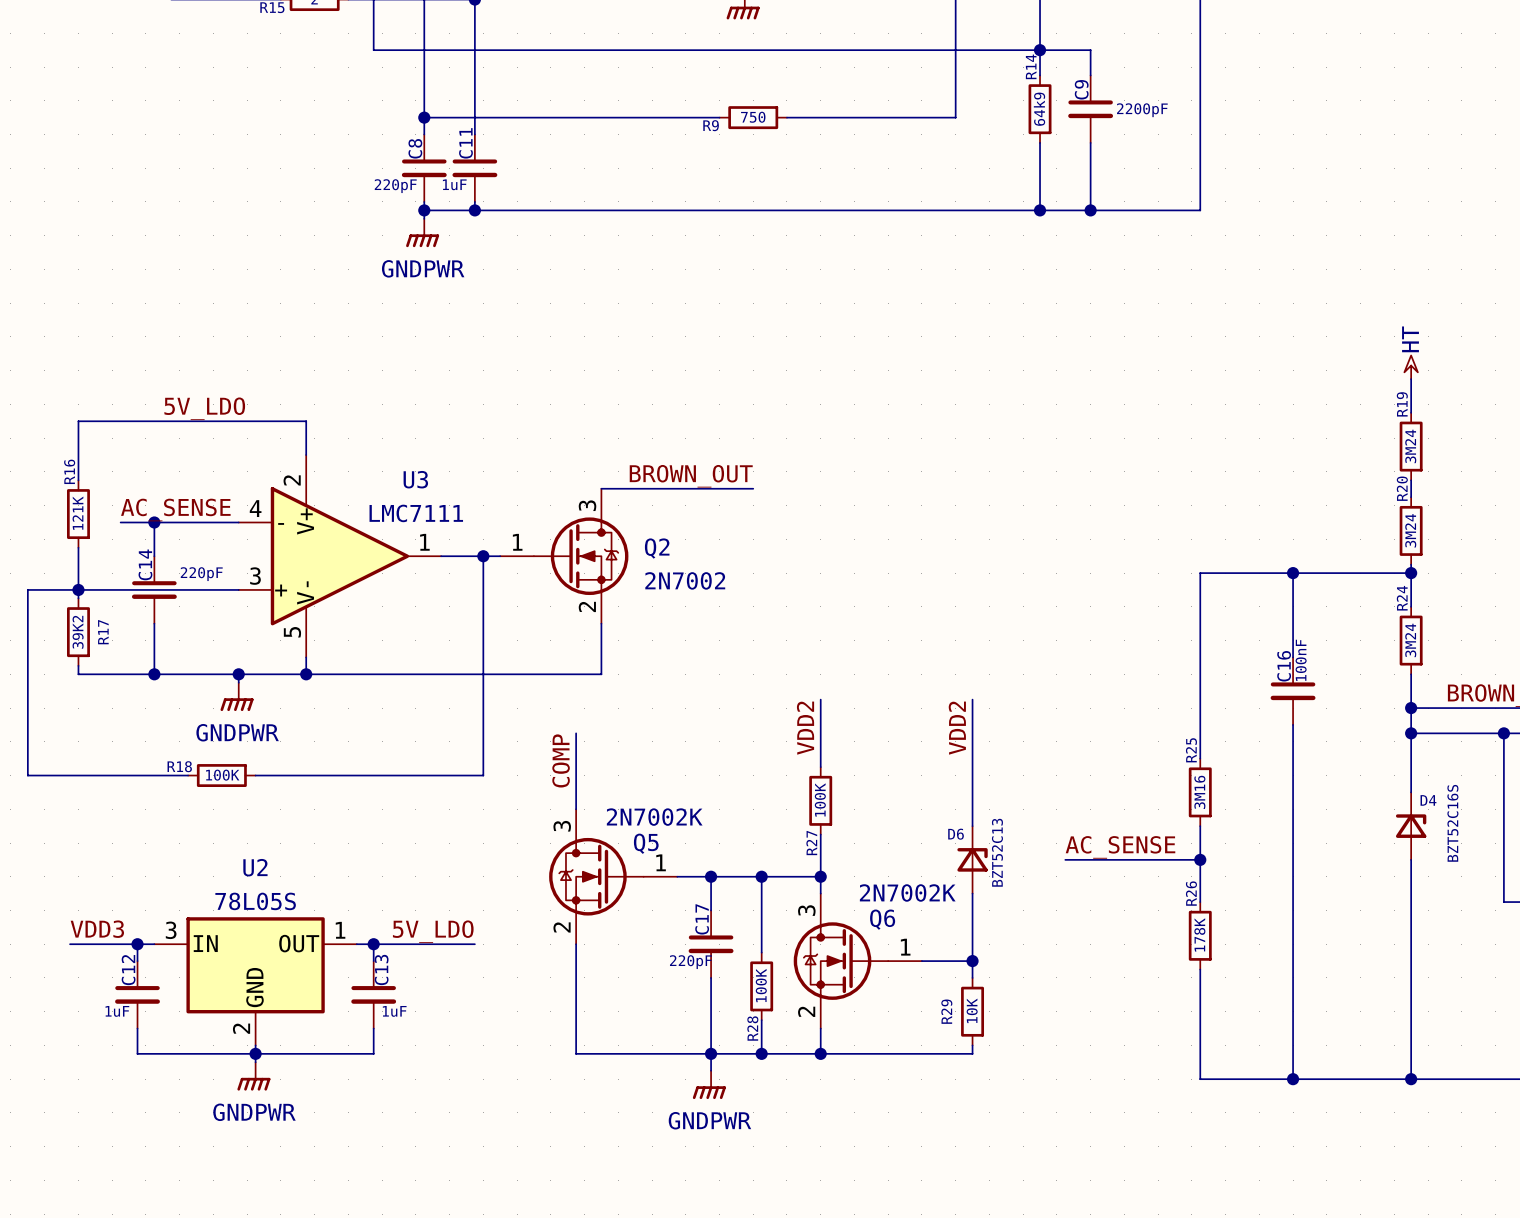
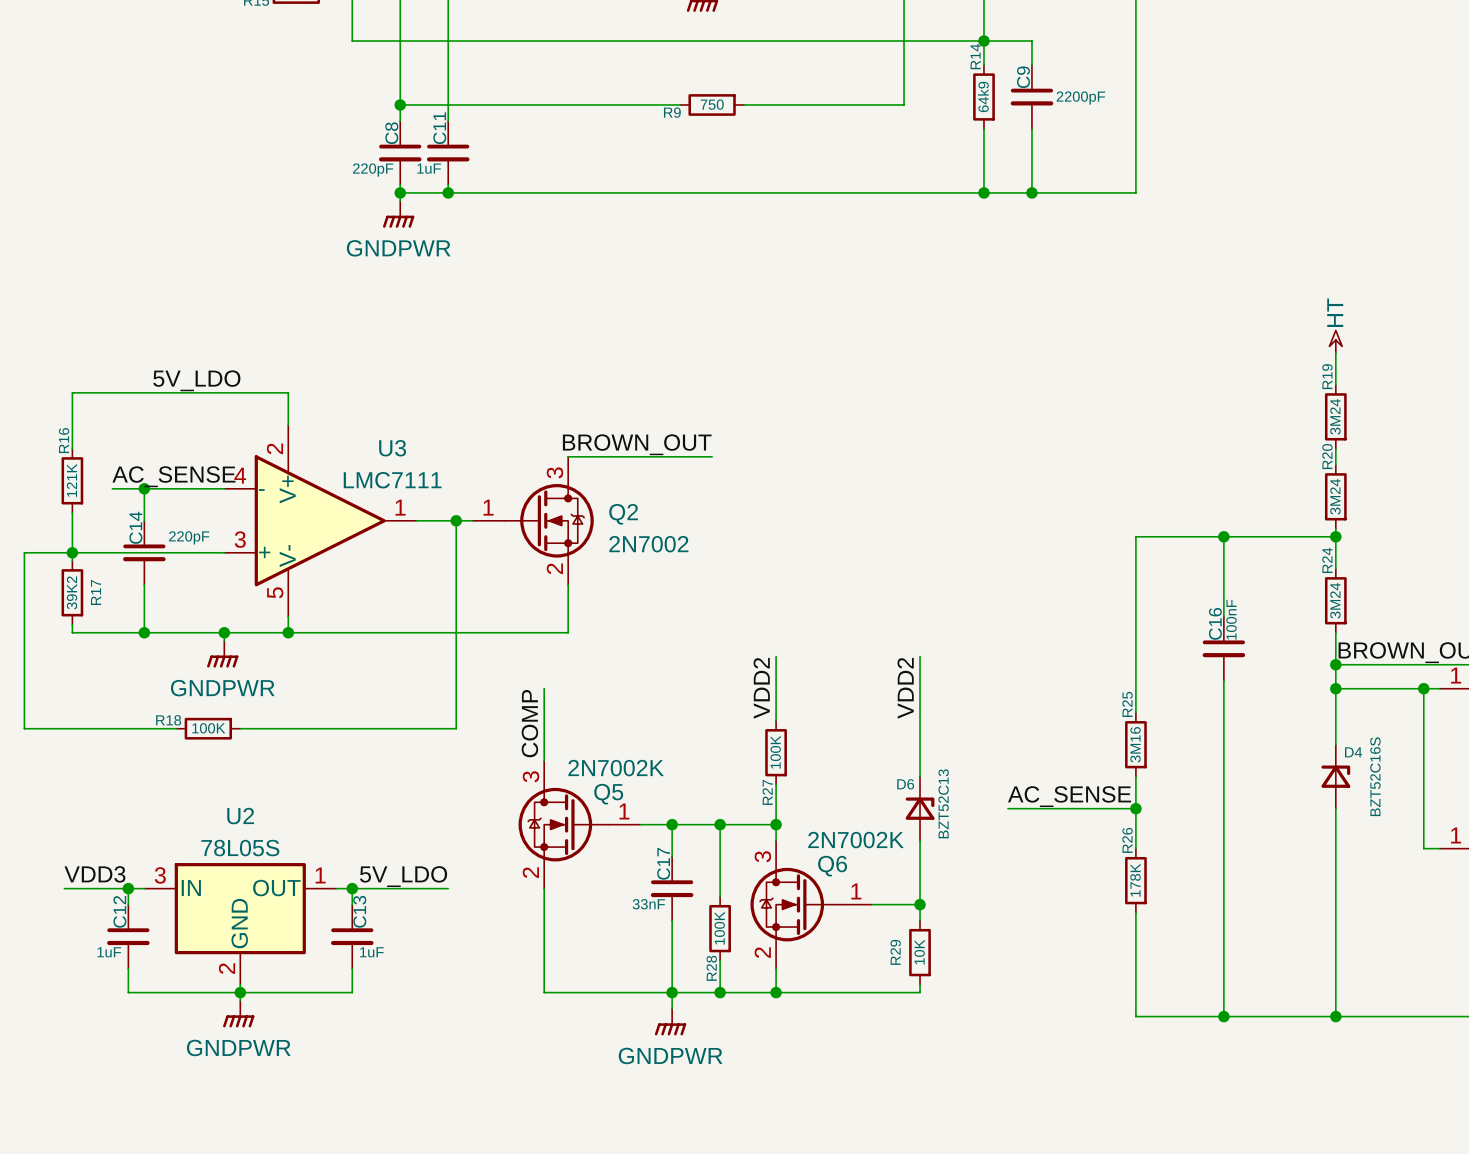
C17 value: 220pF (690, 962) -> 33nF (648, 904)

